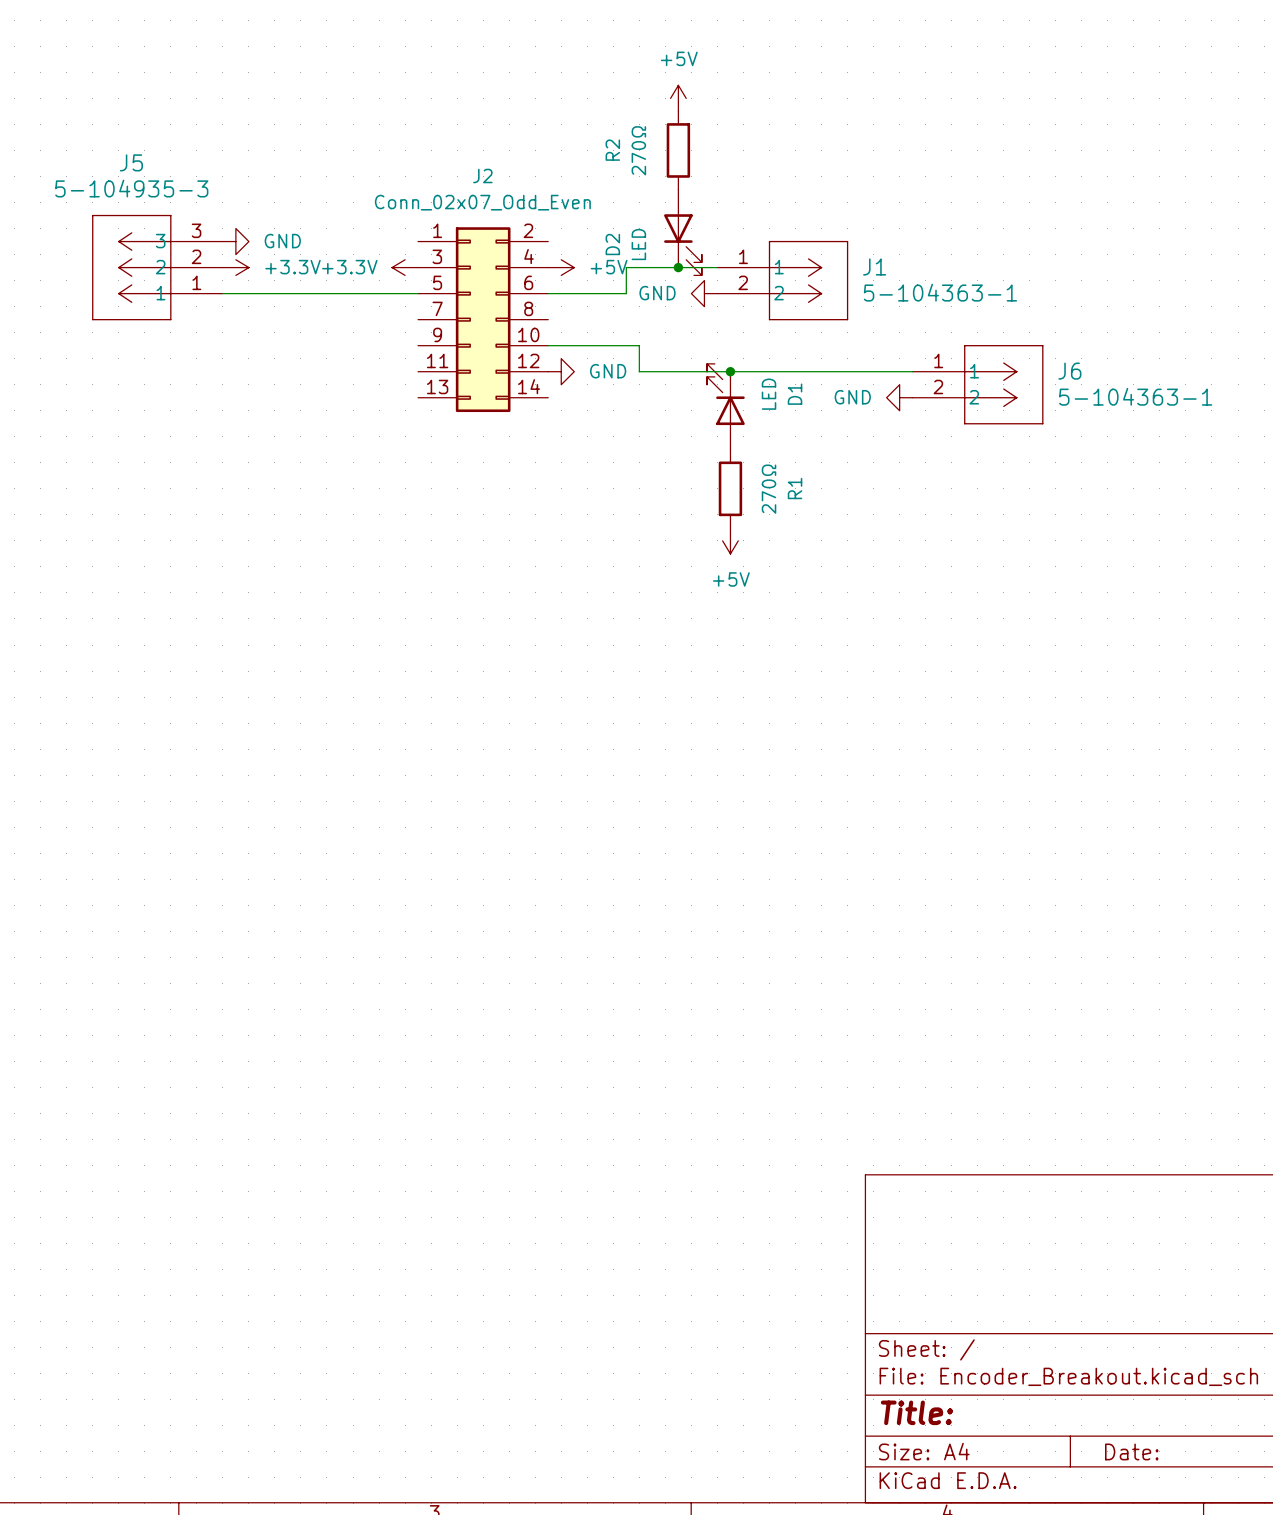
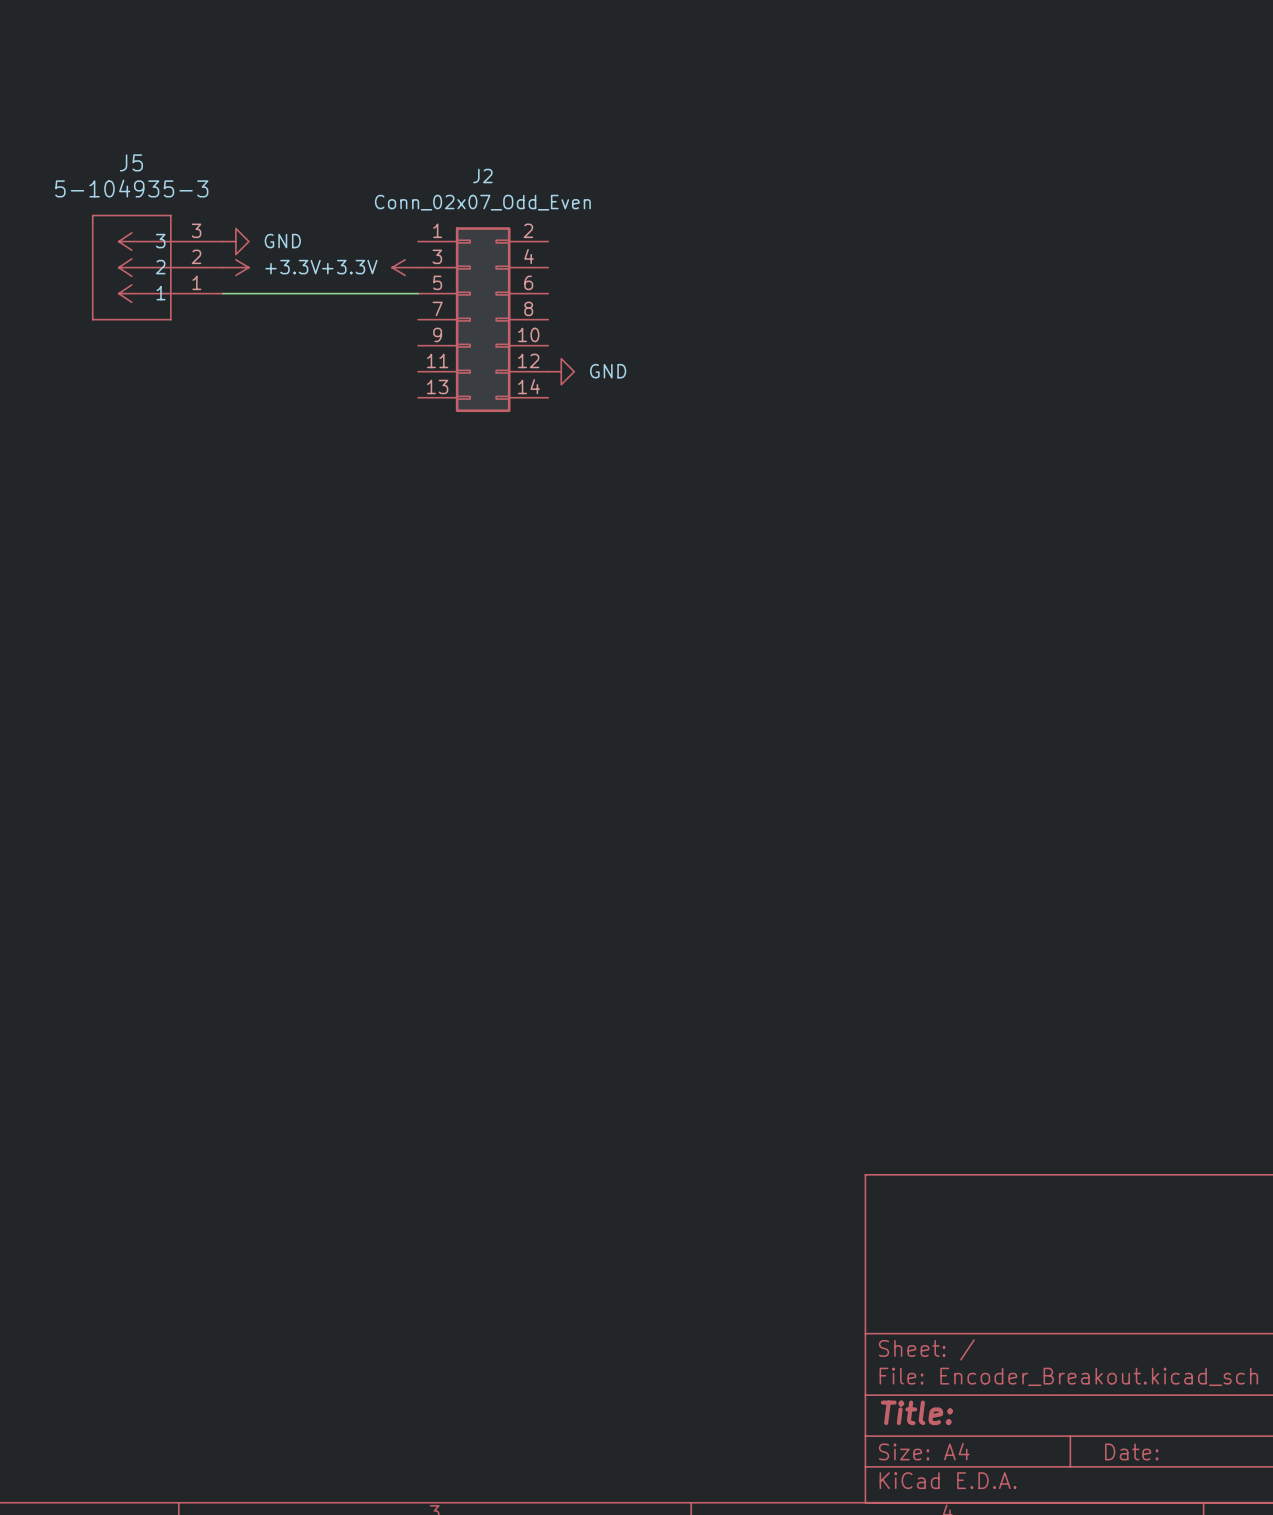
power symbol: +5V (678, 98) -> none
R2: 270Ω (678, 150) -> none
D2: LED (682, 232) -> none
power symbol: +5V (561, 267) -> none
junction: (678, 267) -> none
wire: (717, 267) (626, 267) (626, 293) (548, 293) -> none
J1: 5-104363-1 (782, 280) -> none
power symbol: GND (704, 293) -> none
wire: (548, 345) (639, 345) (639, 371) (912, 371) -> none
junction: (730, 371) -> none
J6: 5-104363-1 (978, 384) -> none
power symbol: GND (899, 397) -> none
D1: LED (725, 406) -> none
R1: 270Ω (730, 488) -> none
power symbol: +5V (730, 540) -> none

